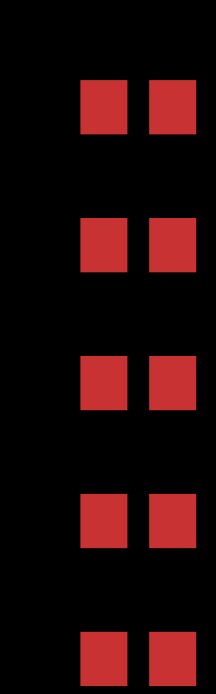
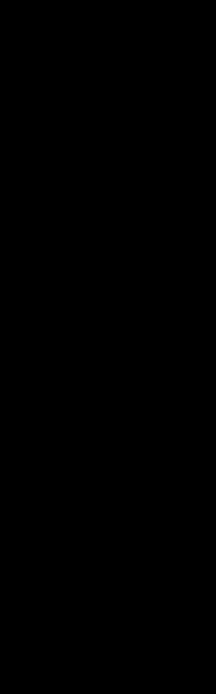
part: (138, 107) -> none
part: (138, 245) -> none
part: (138, 383) -> none
part: (138, 521) -> none
part: (138, 658) -> none

